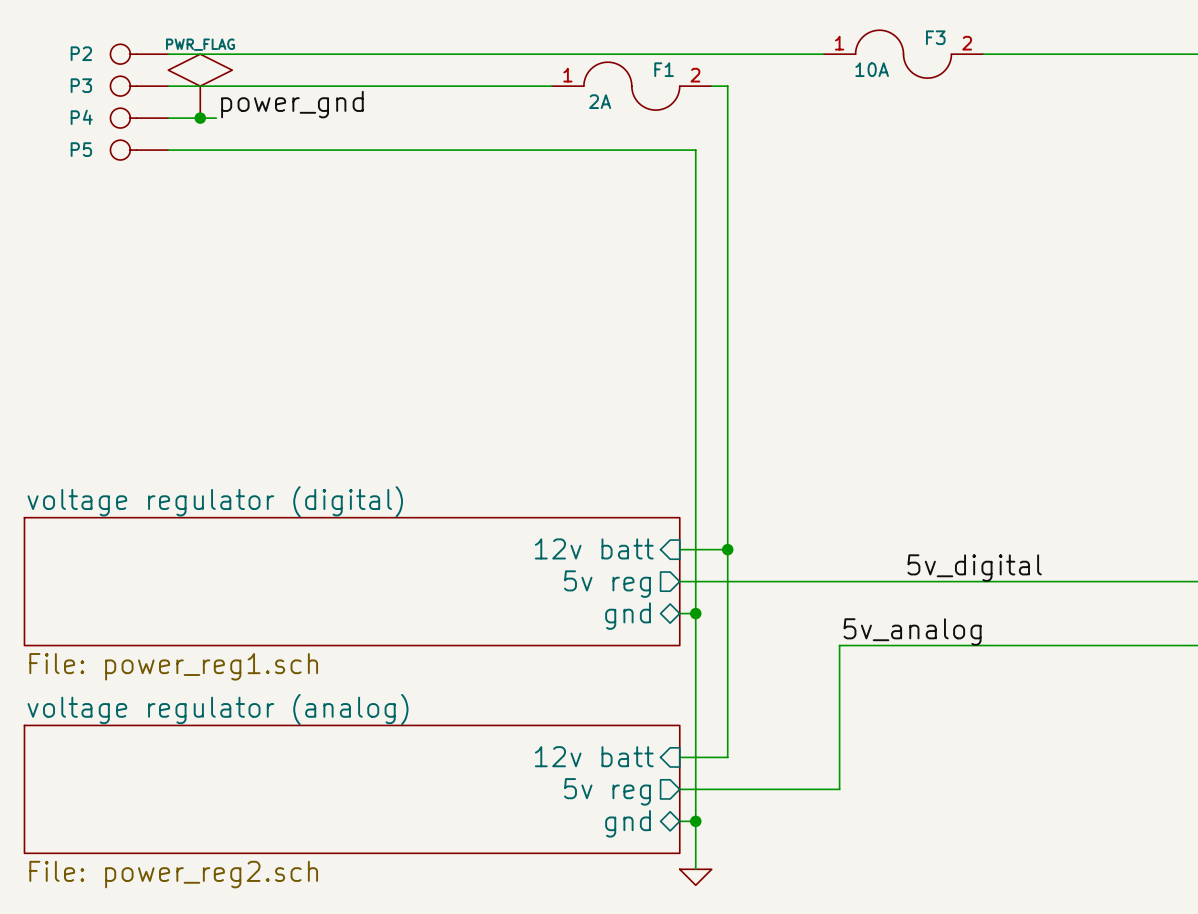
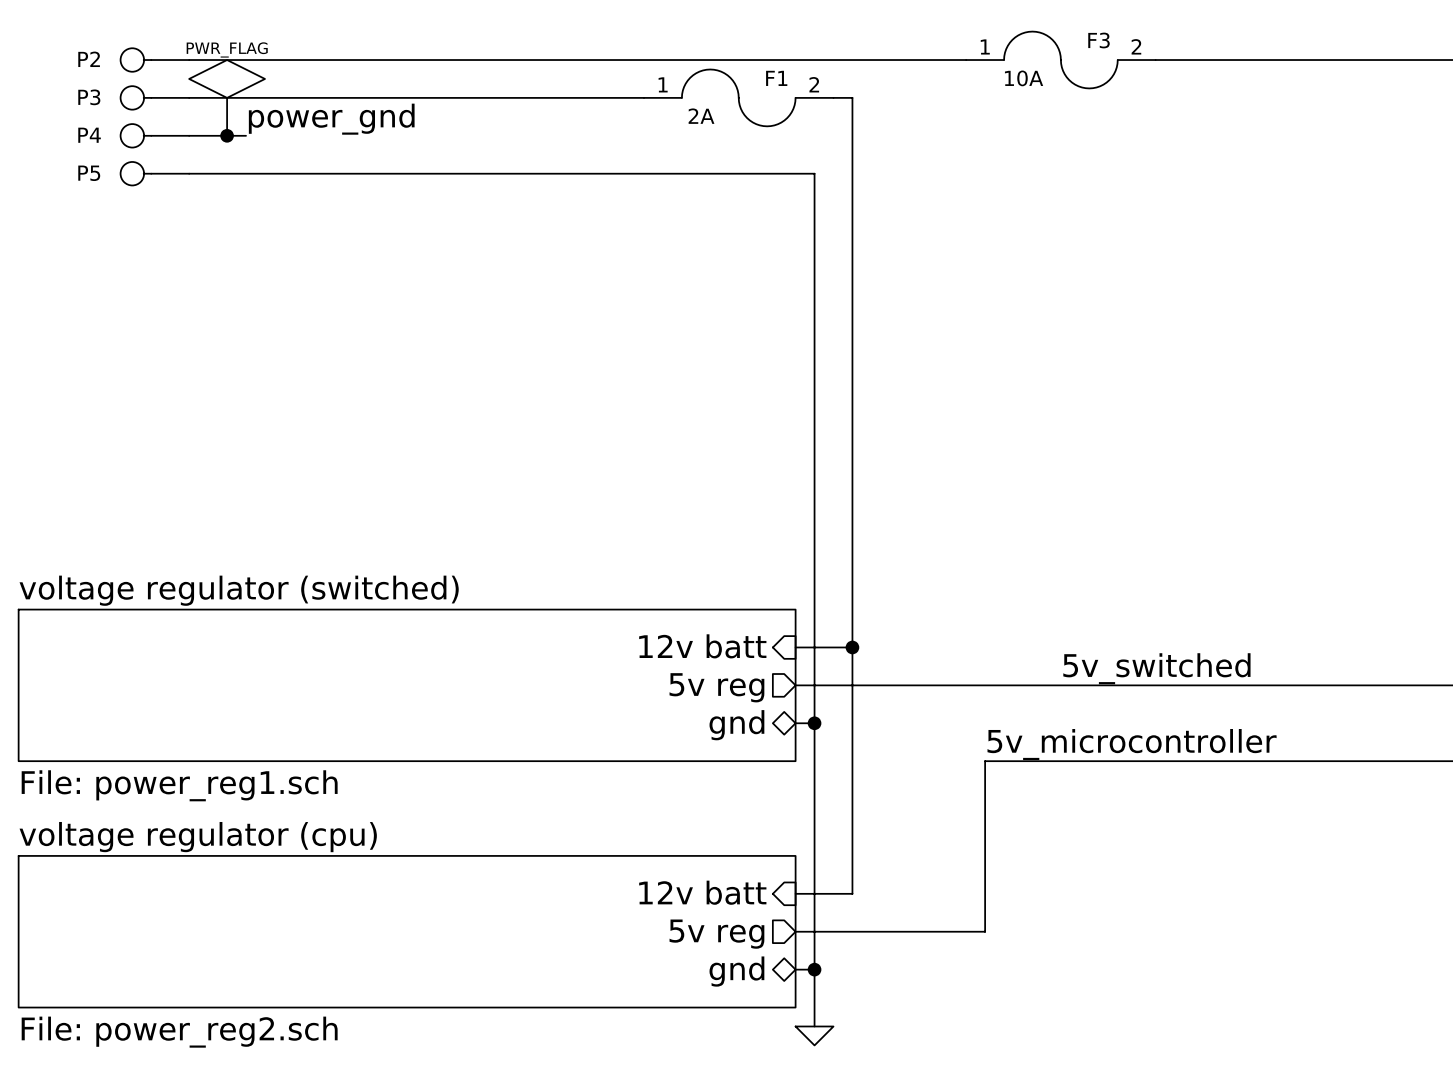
sheet voltage regulator (digital) name: voltage regulator (digital) (215, 501) -> voltage regulator (switched) (239, 590)
label: 5v_digital (974, 568) -> 5v_switched (1156, 668)
label: 5v_analog (912, 632) -> 5v_microcontroller (1132, 744)
sheet voltage regulator (analog) name: voltage regulator (analog) (217, 709) -> voltage regulator (cpu) (198, 837)

